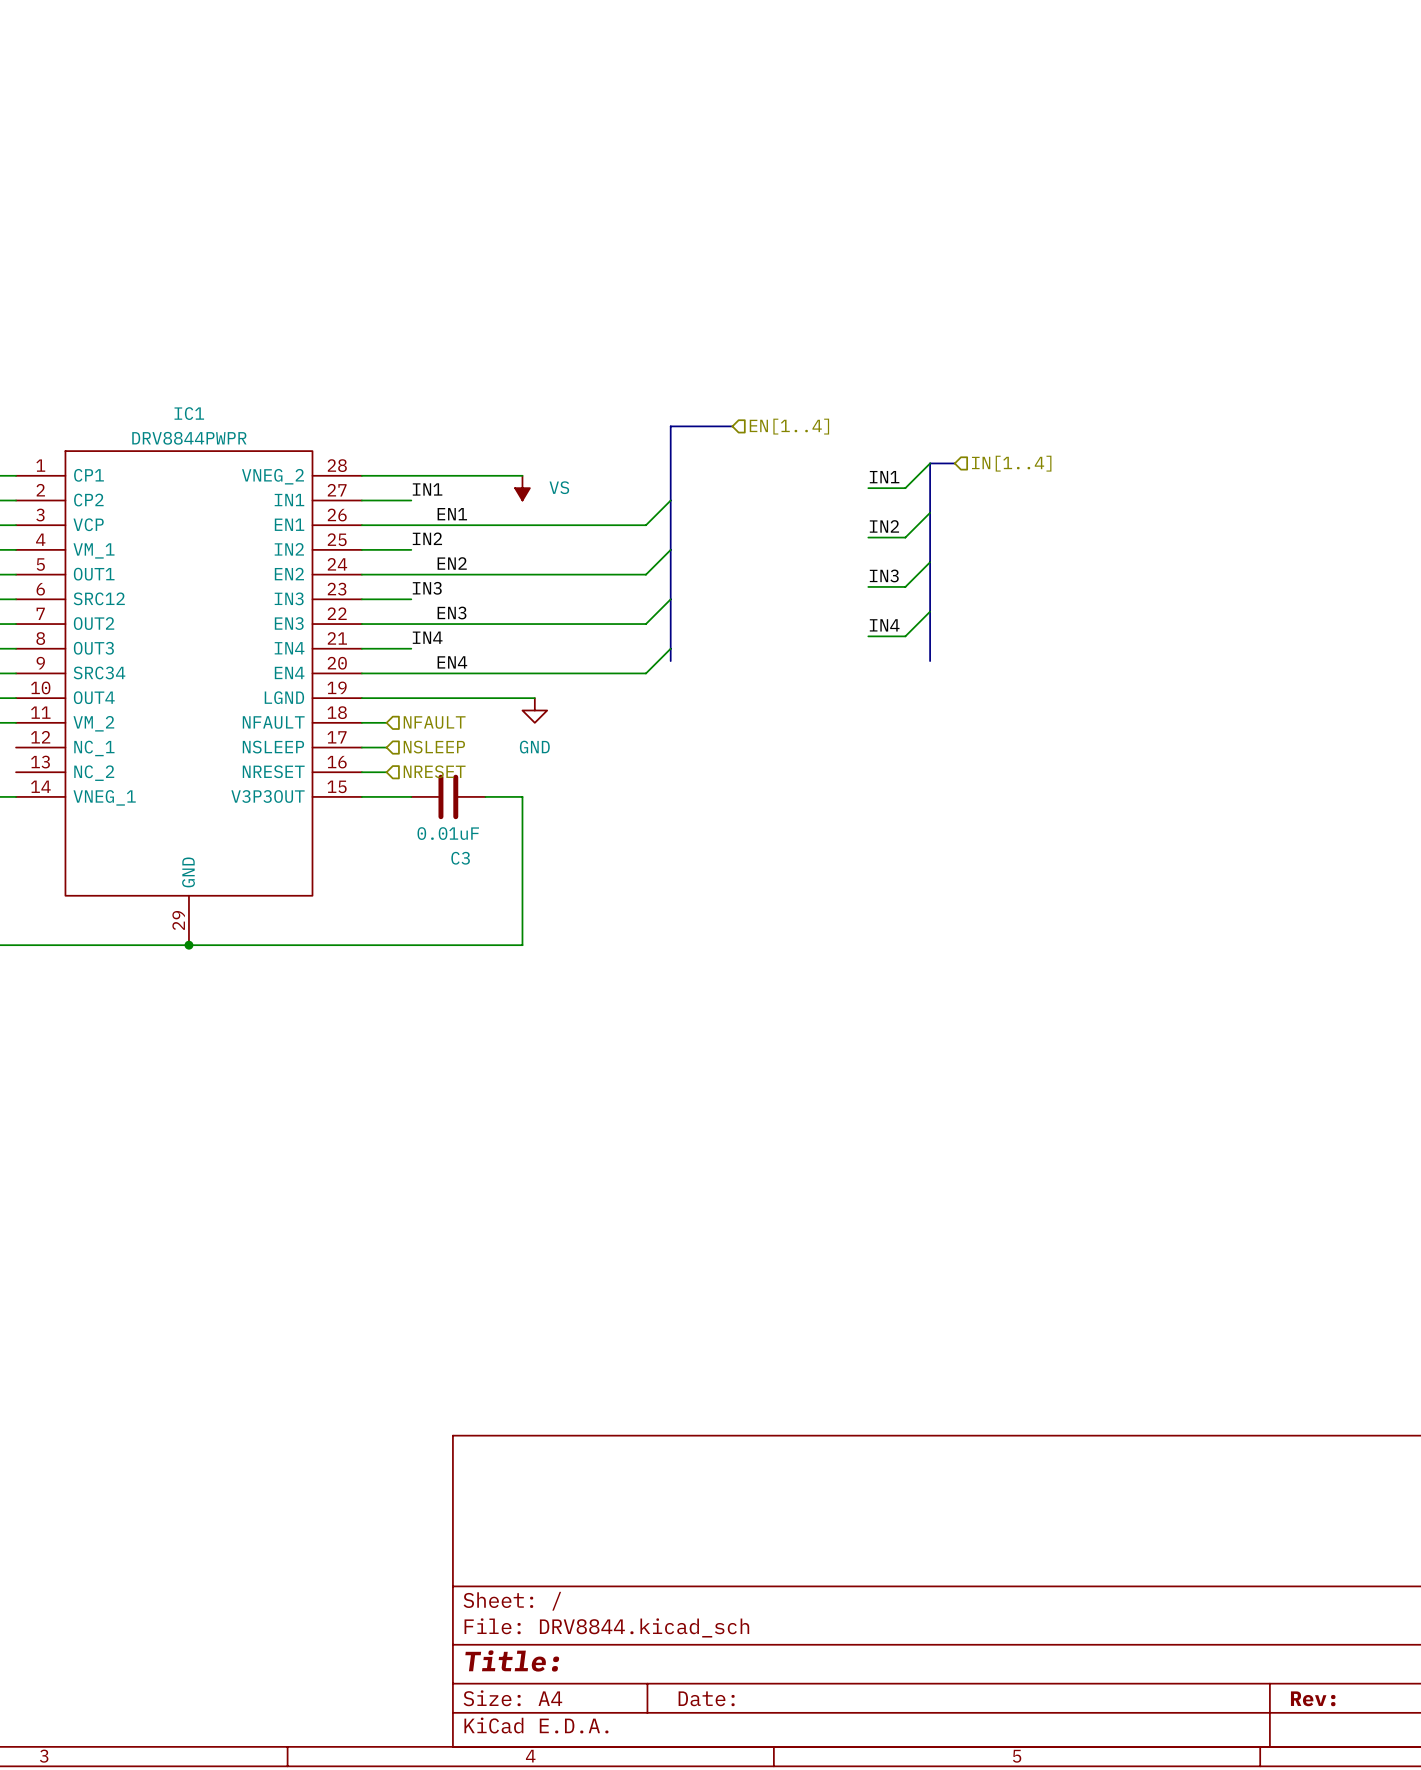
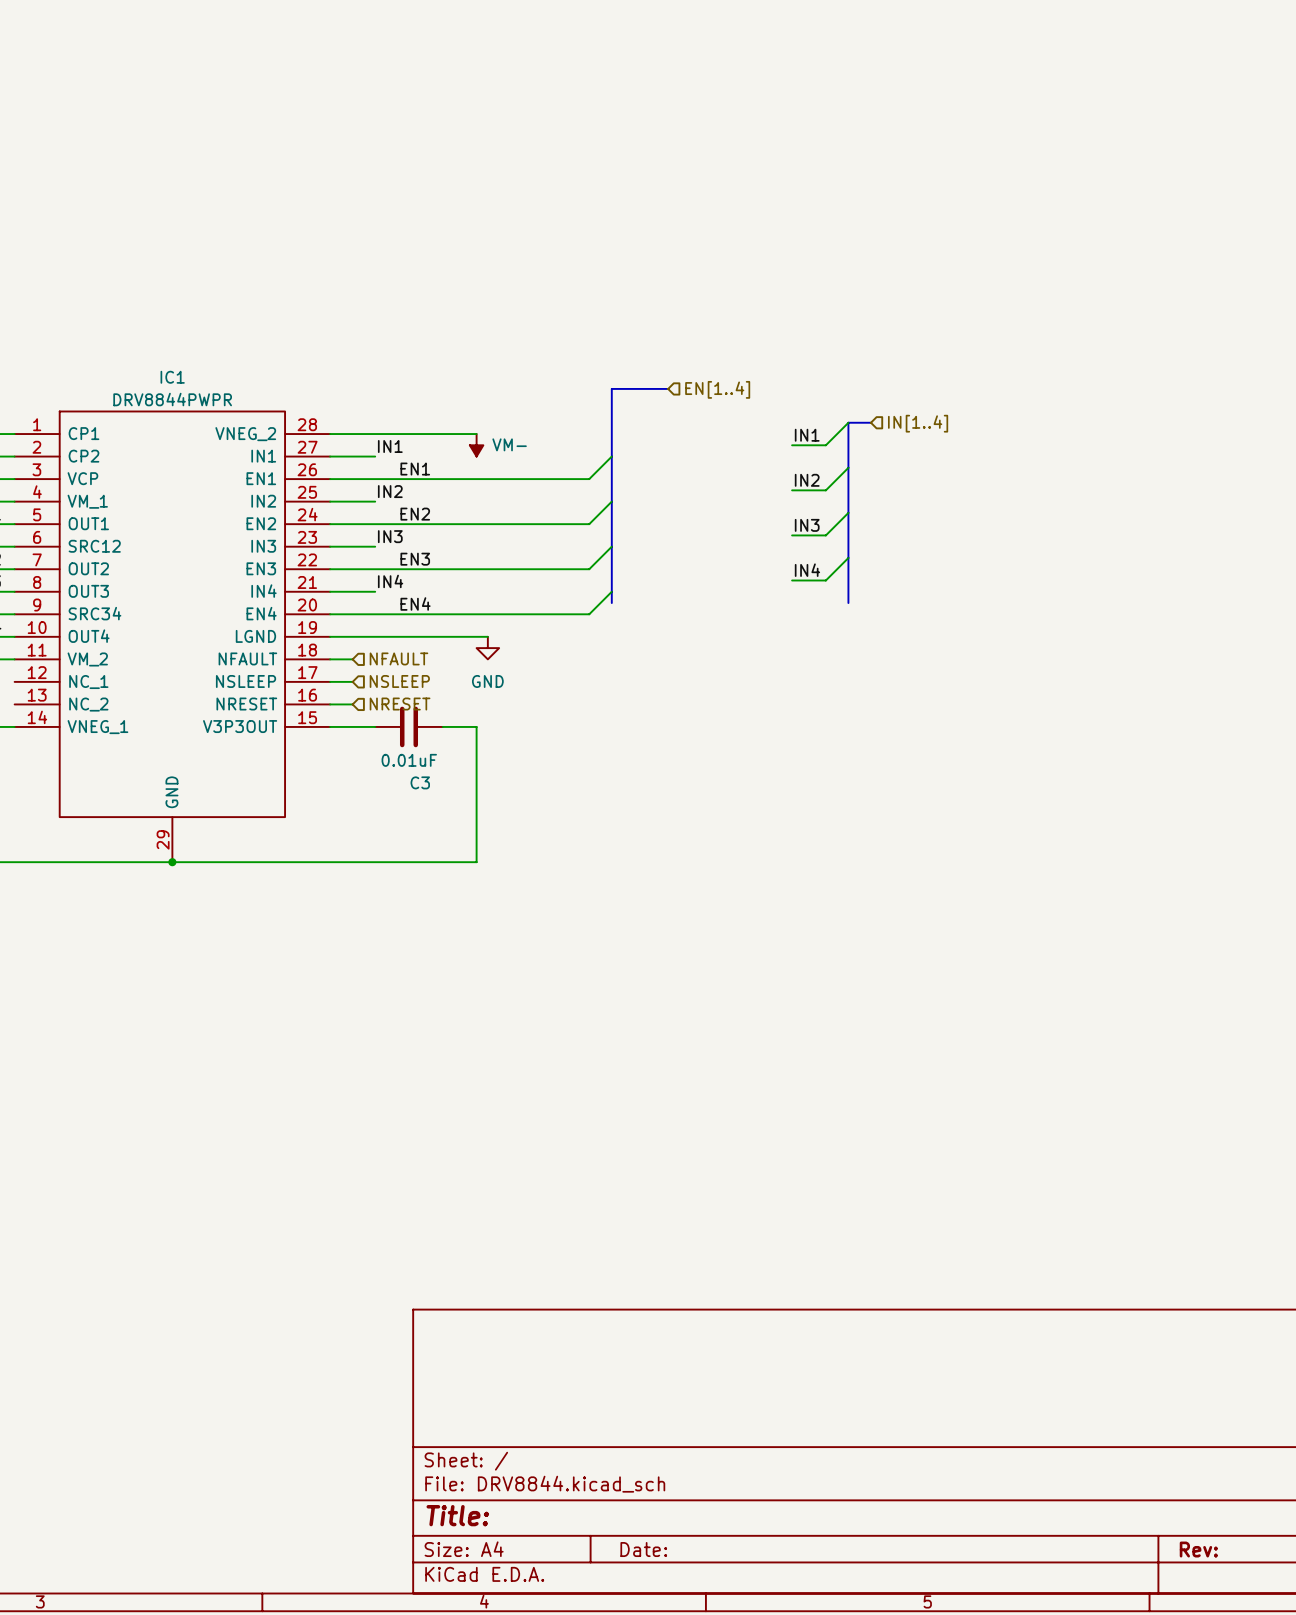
power symbol: VS (522, 488) -> VM- (476, 445)

